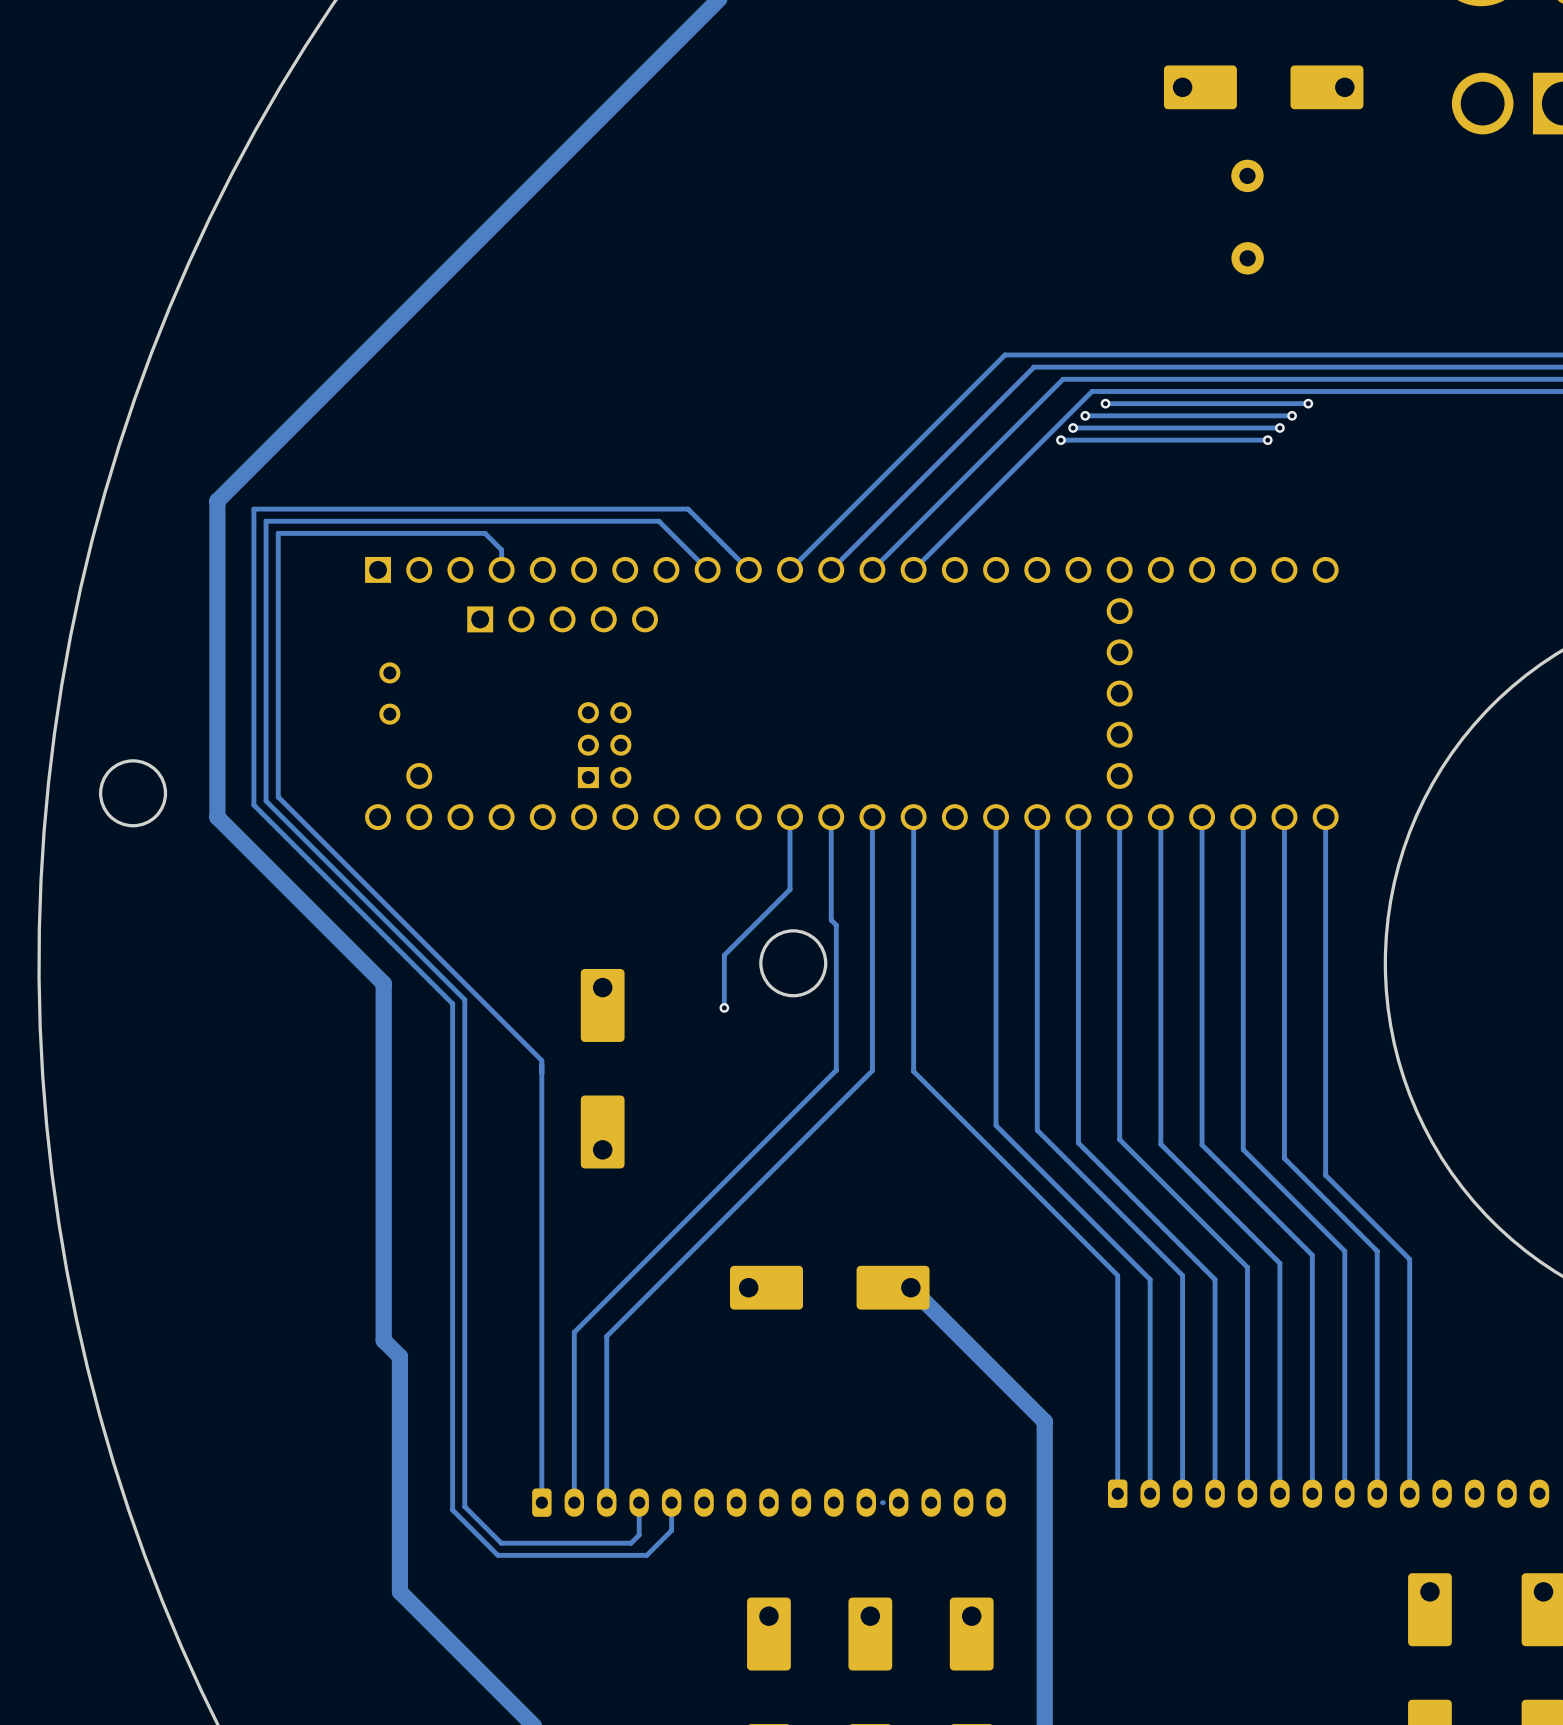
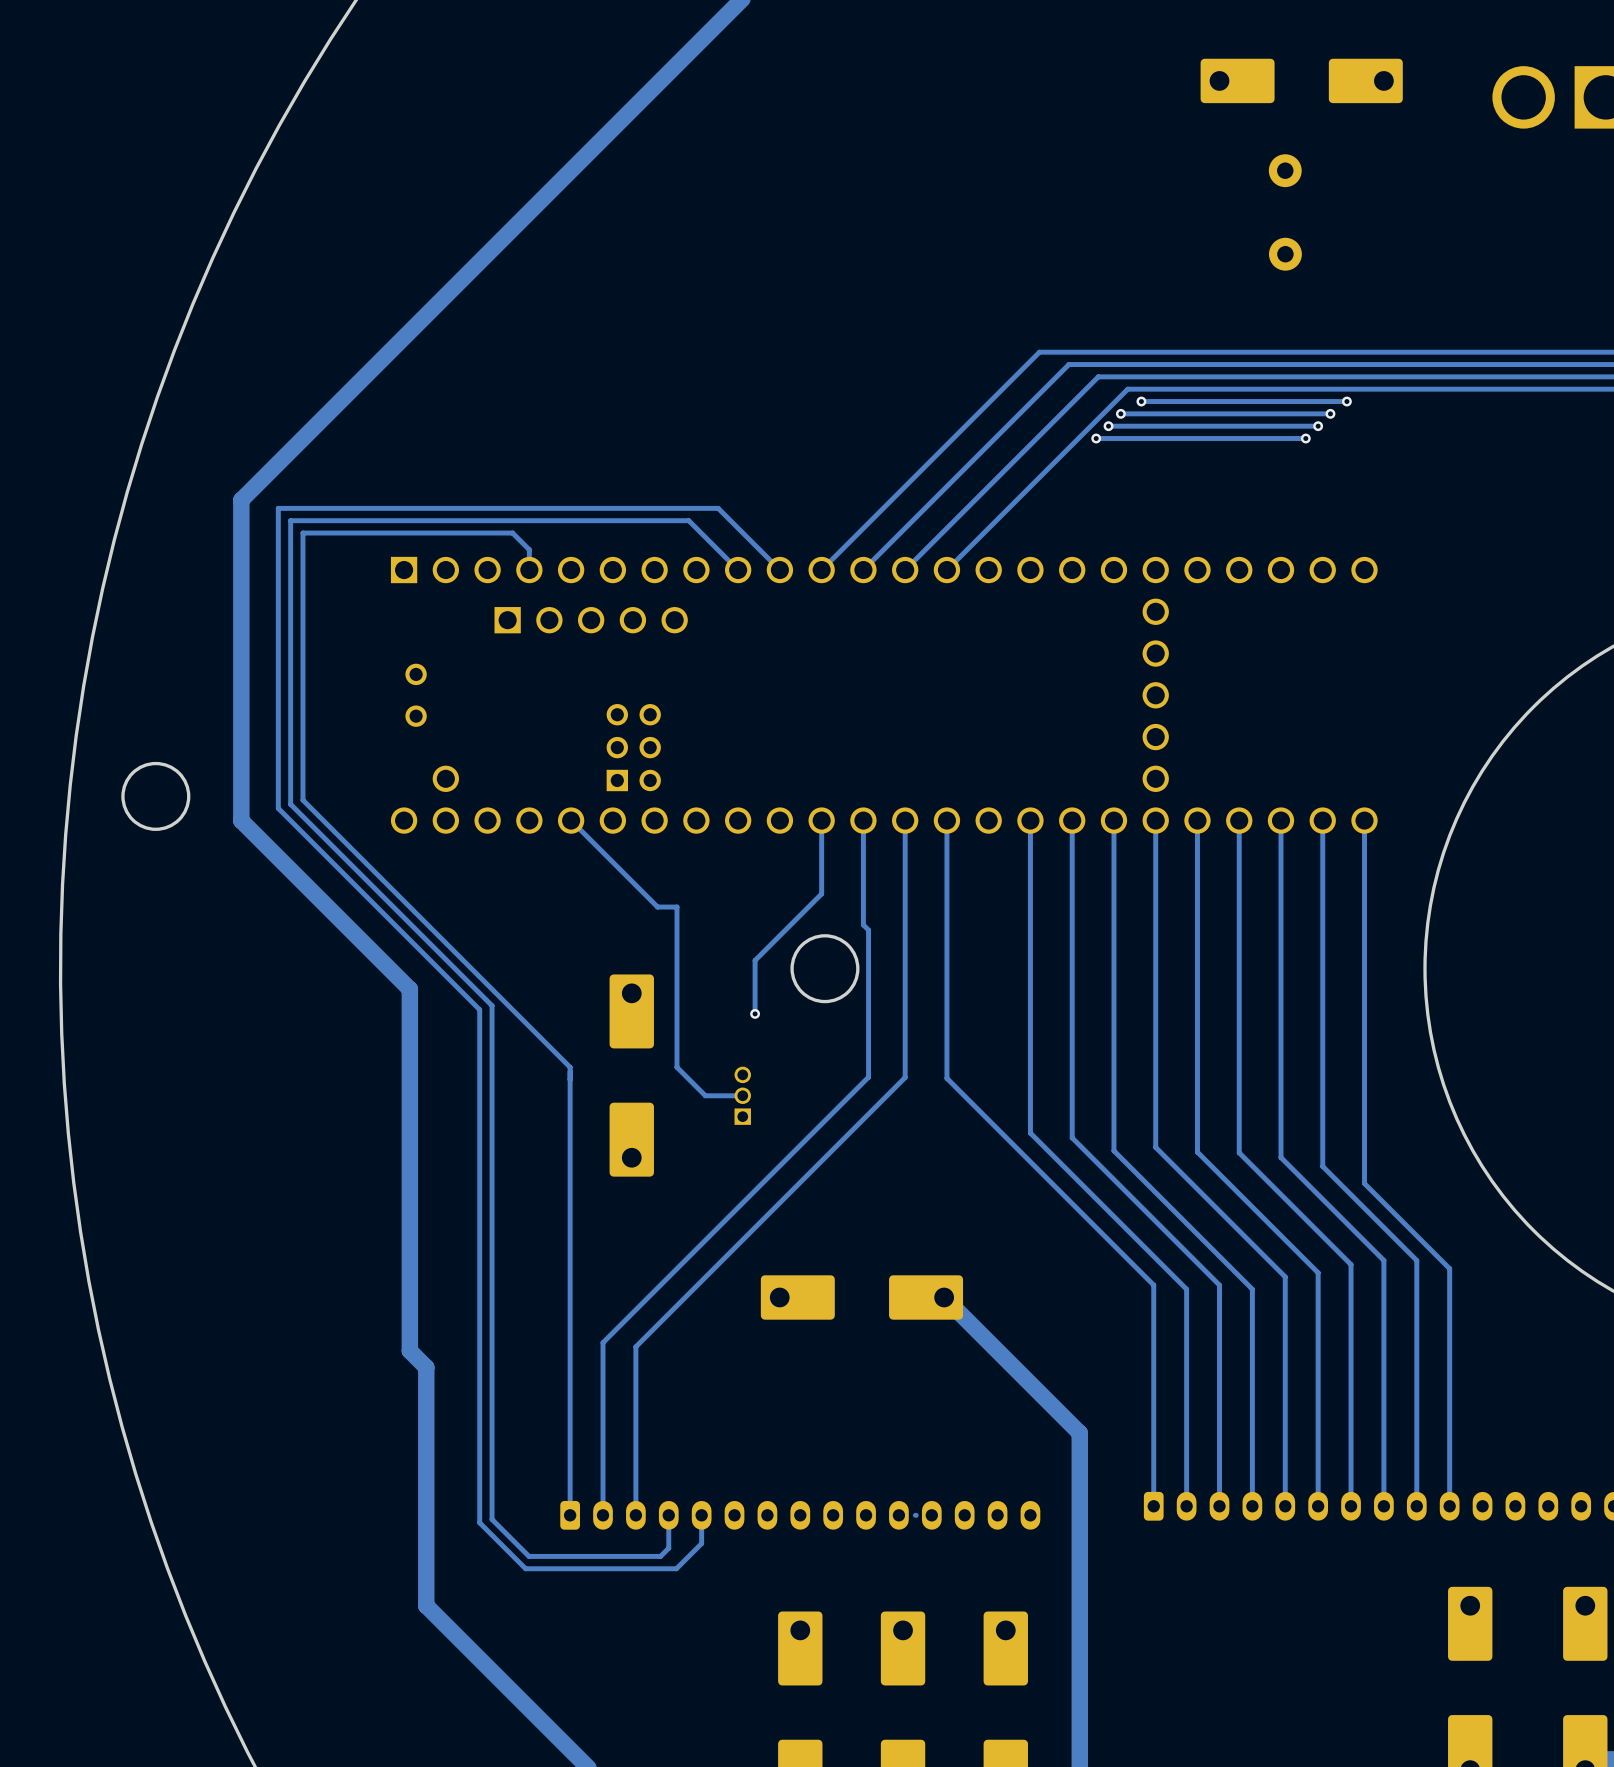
track: none -> (571, 820) (657, 907) (676, 907) (676, 1067) (705, 1095) (742, 1095)
part: none -> (742, 1095)

